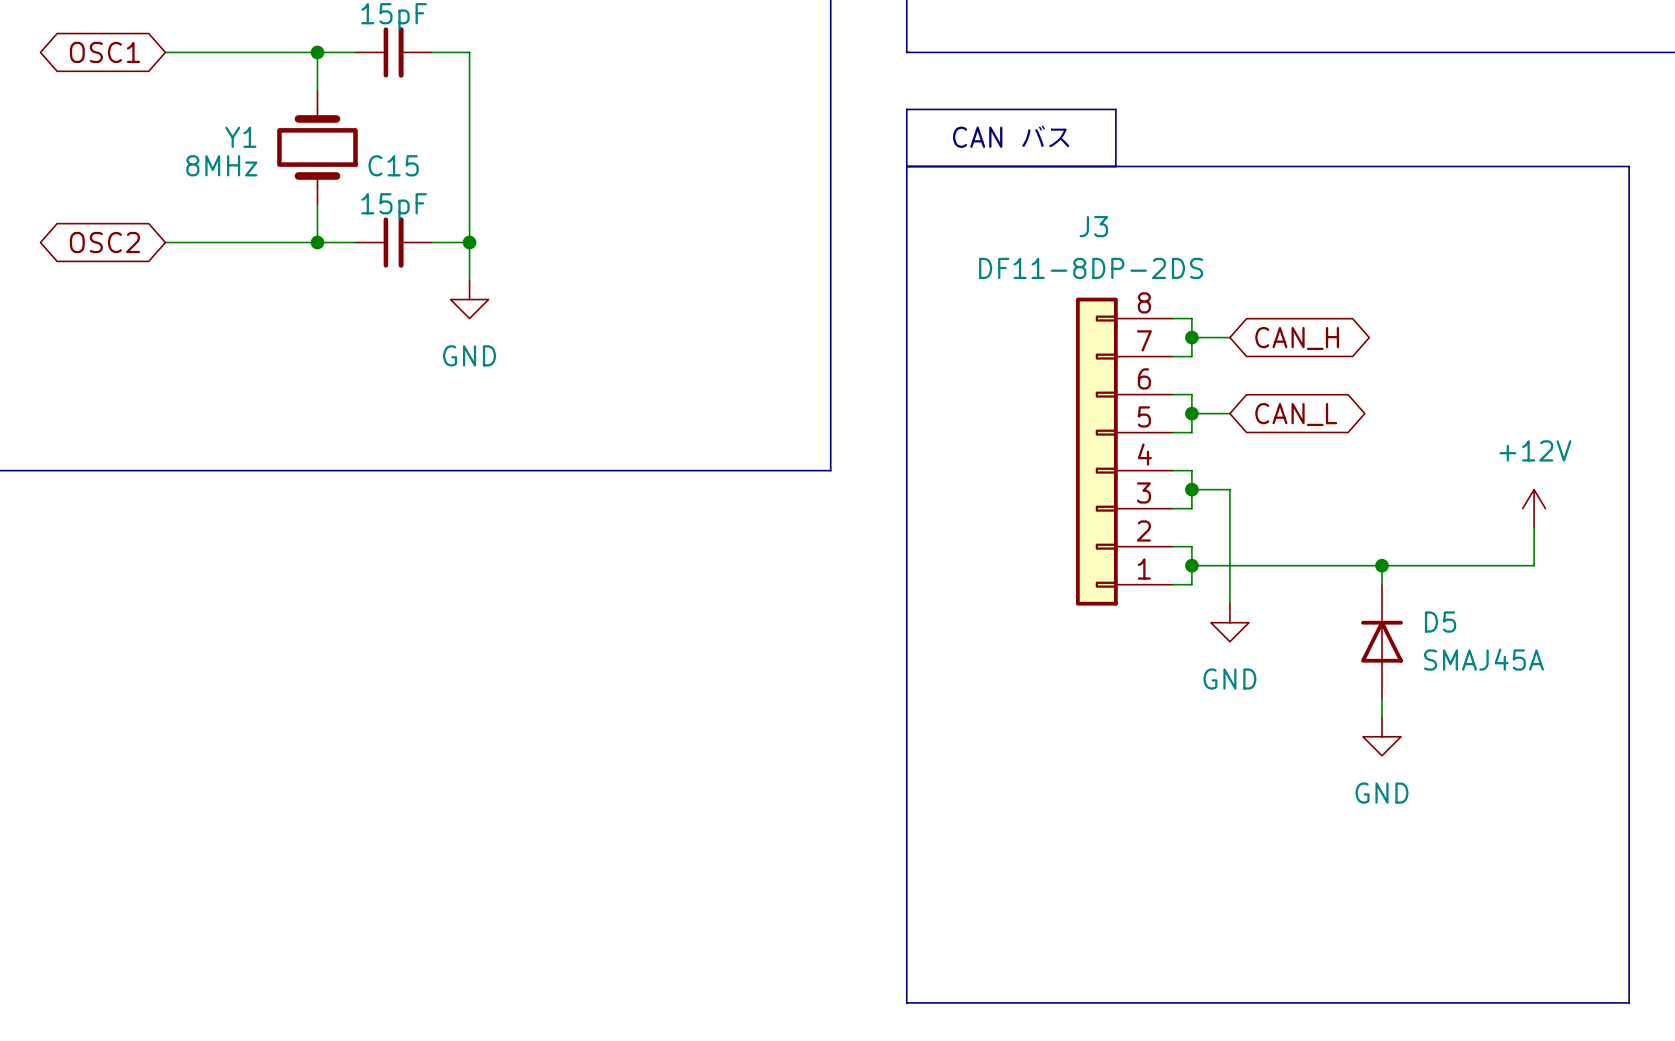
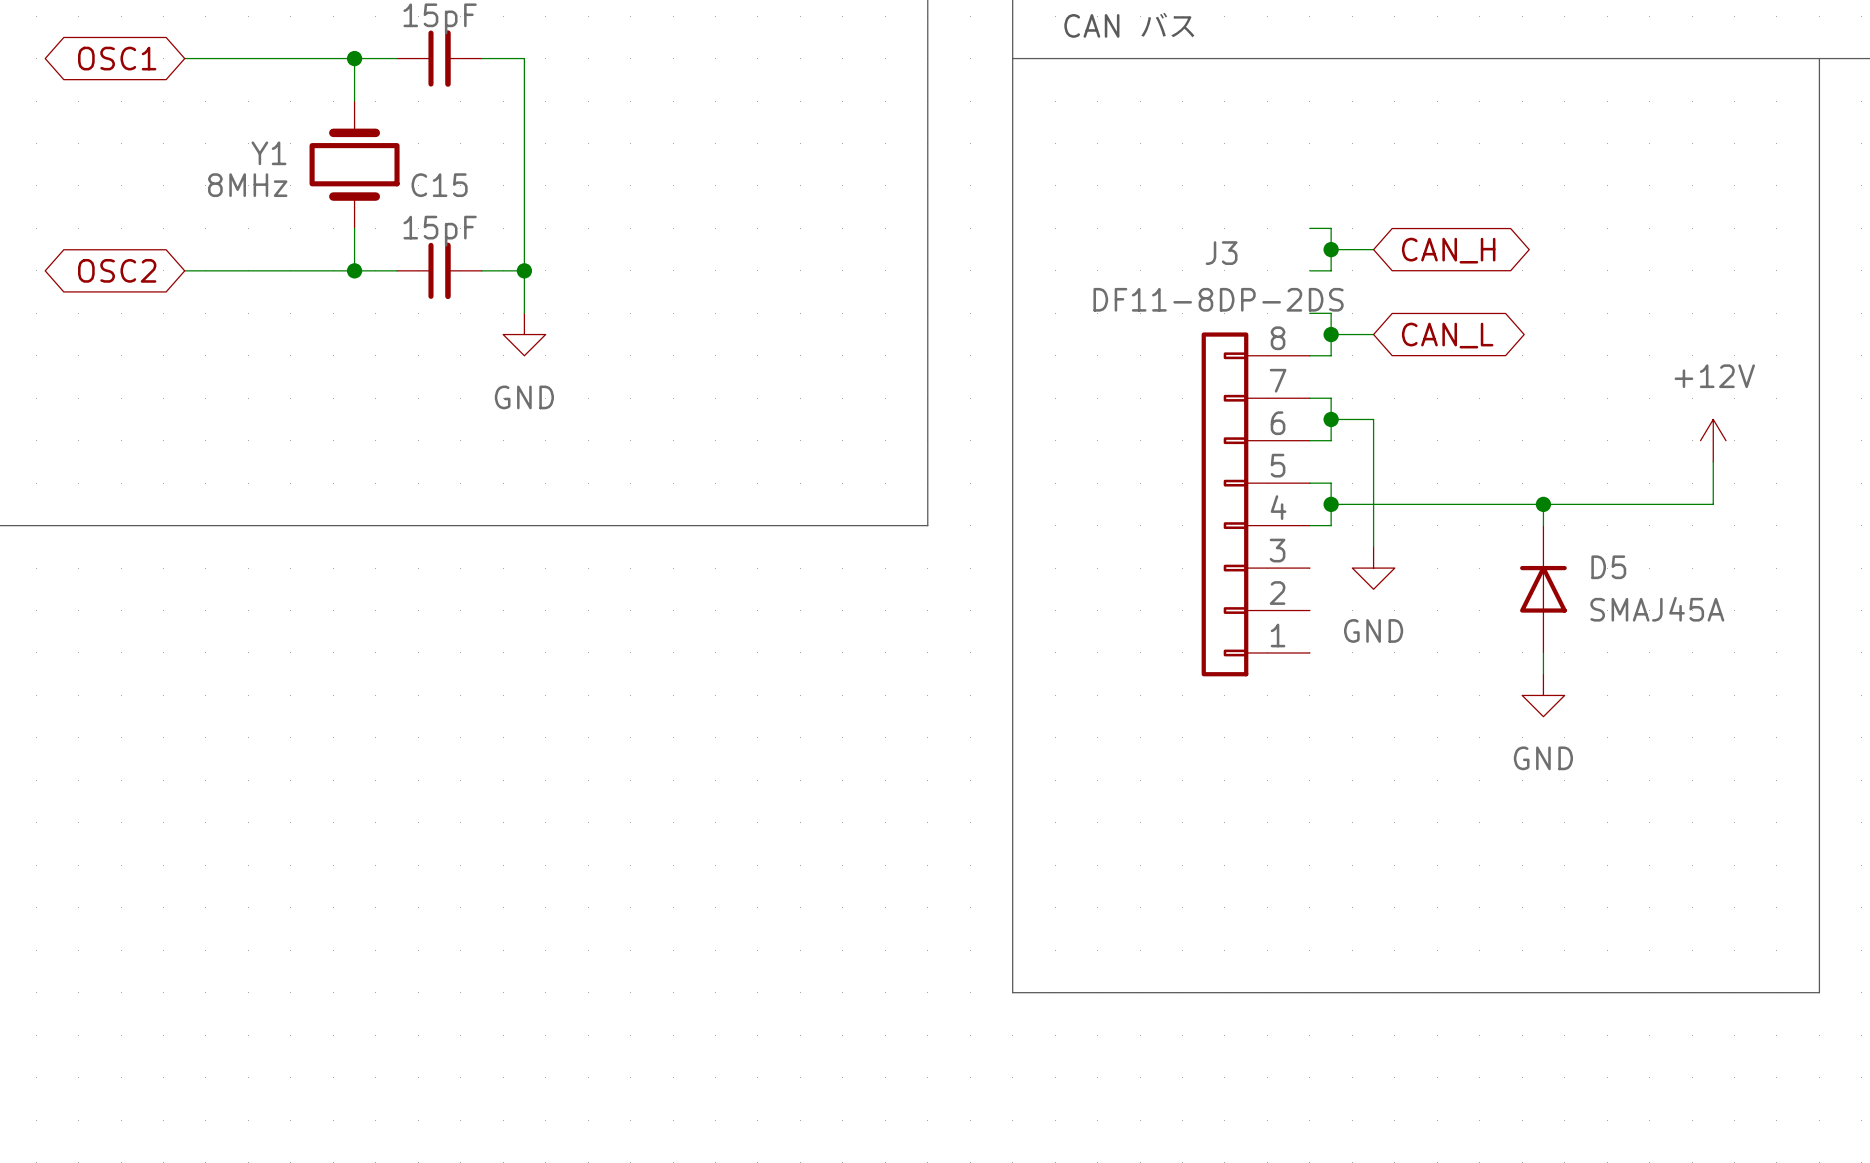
line: (906, 109) (1115, 109) (1115, 166) -> (1012, 122) (1012, 58)
text position: CAN バス (1011, 136) -> CAN バス (1130, 25)
line: (906, 166) (1629, 166) -> (1819, 58) (1819, 185)
junction: none -> (1331, 249)
wire: none -> (1309, 313) (1331, 313) (1331, 355)
junction: none -> (1331, 334)
wire: (1191, 318) (1191, 356) -> (1331, 440) (1331, 398)
wire: (1191, 337) (1229, 337) -> (1331, 249) (1373, 249)
junction: (1191, 337) -> none
global label position: CAN_H (1297, 338) -> CAN_H (1448, 250)
junction: none -> (1331, 419)
wire: (1191, 394) (1191, 432) -> (1331, 525) (1331, 483)
wire: (1191, 413) (1229, 413) -> (1331, 334) (1373, 334)
junction: (1191, 413) -> none
global label position: CAN_L (1296, 414) -> CAN_L (1447, 335)
junction: none -> (1331, 504)
junction: none -> (1543, 504)
wire: (1191, 470) (1191, 508) (1172, 508) -> none
wire: (1191, 489) (1229, 489) (1229, 603) -> (1331, 419) (1373, 419) (1373, 546)
junction: (1191, 489) -> none
power symbol: none -> GND (1373, 568)
power symbol position: +12V (1534, 508) -> +12V (1713, 440)
wire: (1534, 527) (1534, 565) (1191, 565) -> (1713, 461) (1713, 504) (1331, 504)
wire: (1172, 546) (1191, 546) (1191, 584) (1172, 584) -> (1309, 228) (1331, 228) (1331, 270) (1309, 270)
junction: (1191, 565) -> none
junction: (1381, 565) -> none
power symbol: GND (1229, 622) -> none
power symbol: none -> GND (1543, 695)
D5 position: (1381, 641) -> (1543, 589)
wire: (1381, 698) (1381, 717) -> (1543, 504) (1543, 525)
power symbol: GND (1381, 736) -> none
line: (906, 888) (906, 1002) (1629, 1002) (1629, 888) -> (1012, 992) (1819, 992)

